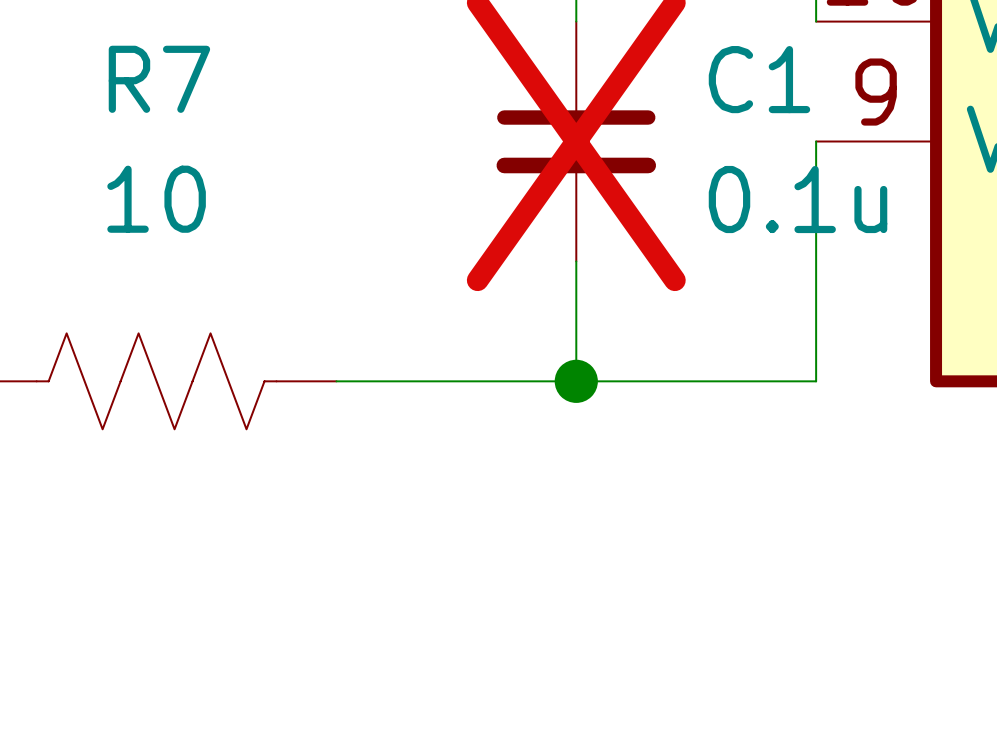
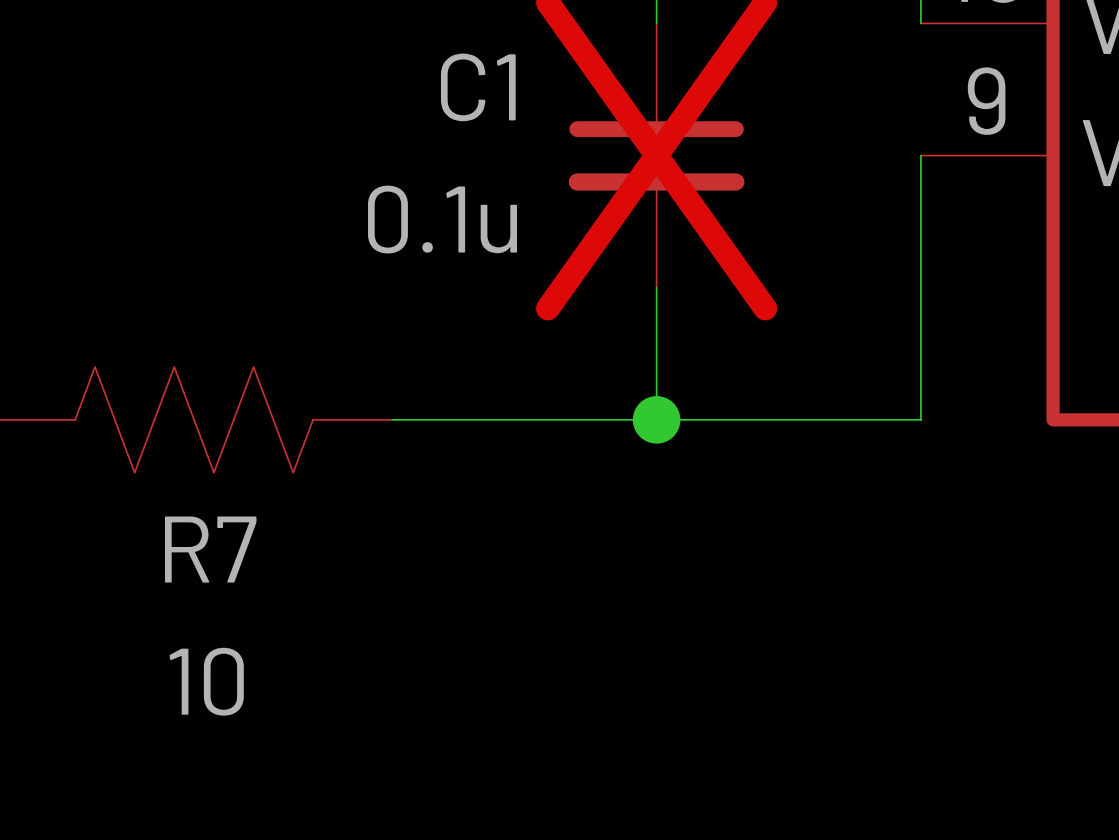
R7 name position: R7 (159, 79) -> R7 (210, 549)
C1 name position: C1 (759, 79) -> C1 (478, 87)
R7 value position: 10 (156, 199) -> 10 (206, 681)
C1 value position: 0.1u (798, 199) -> 0.1u (442, 219)

